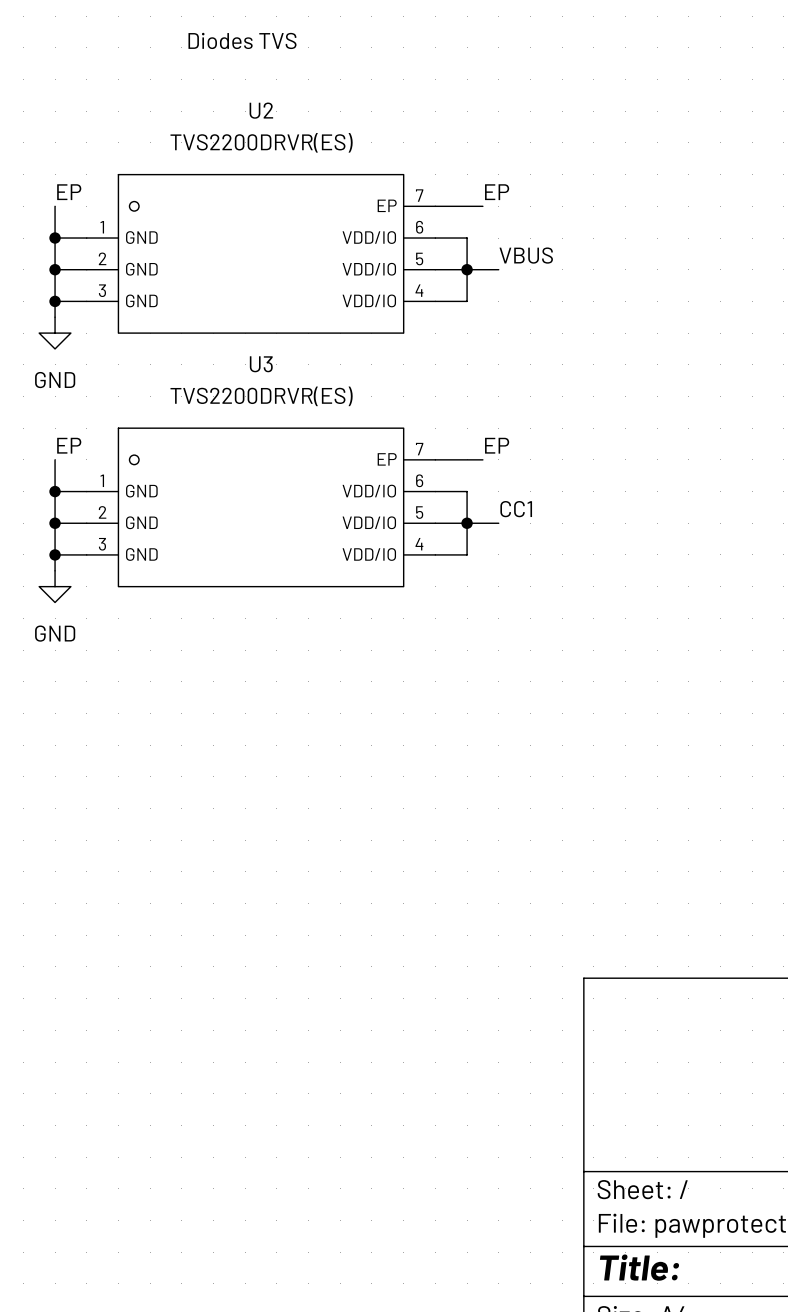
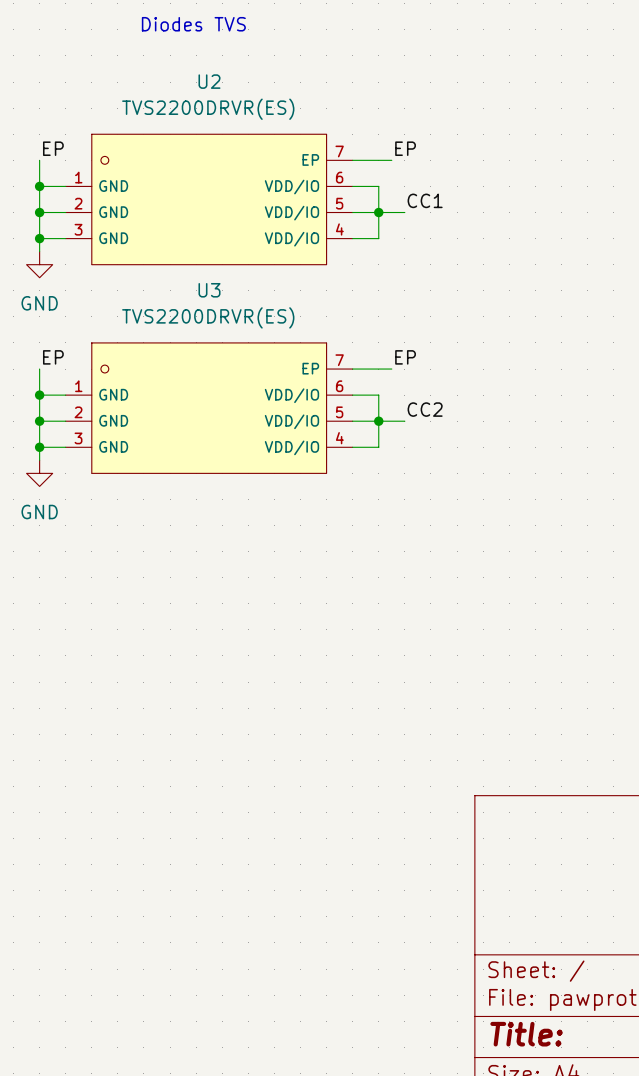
label: VBUS (526, 255) -> CC1 (425, 200)
label: CC1 (516, 509) -> CC2 (425, 409)

